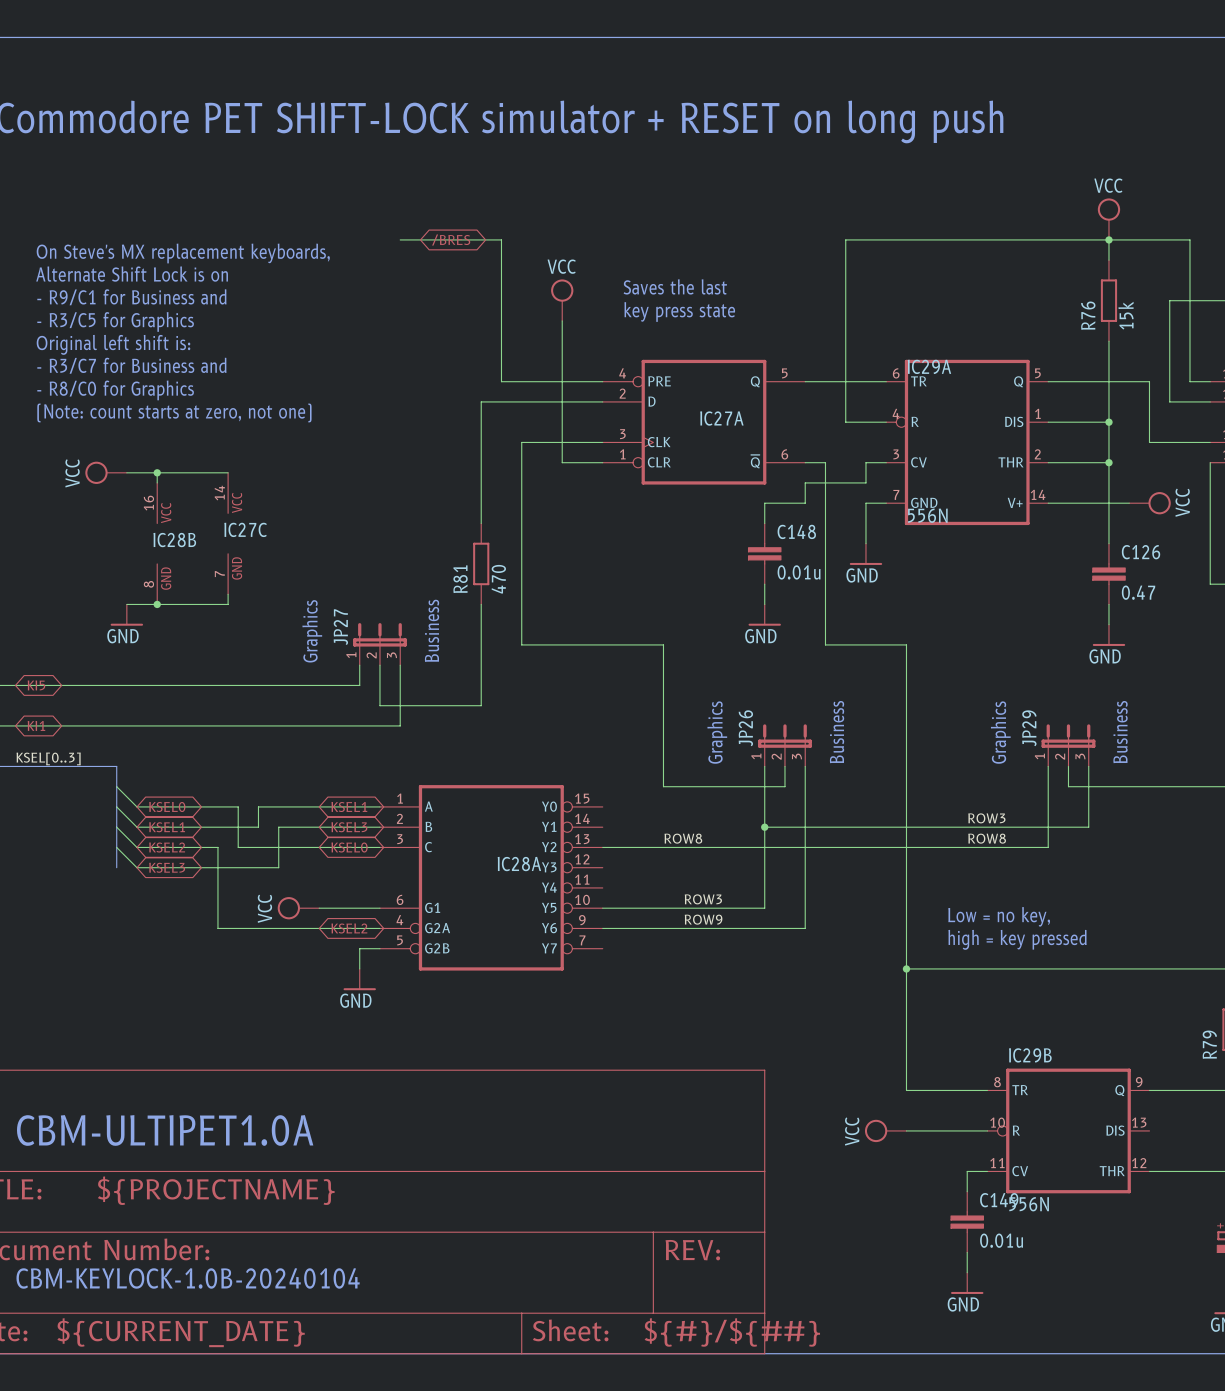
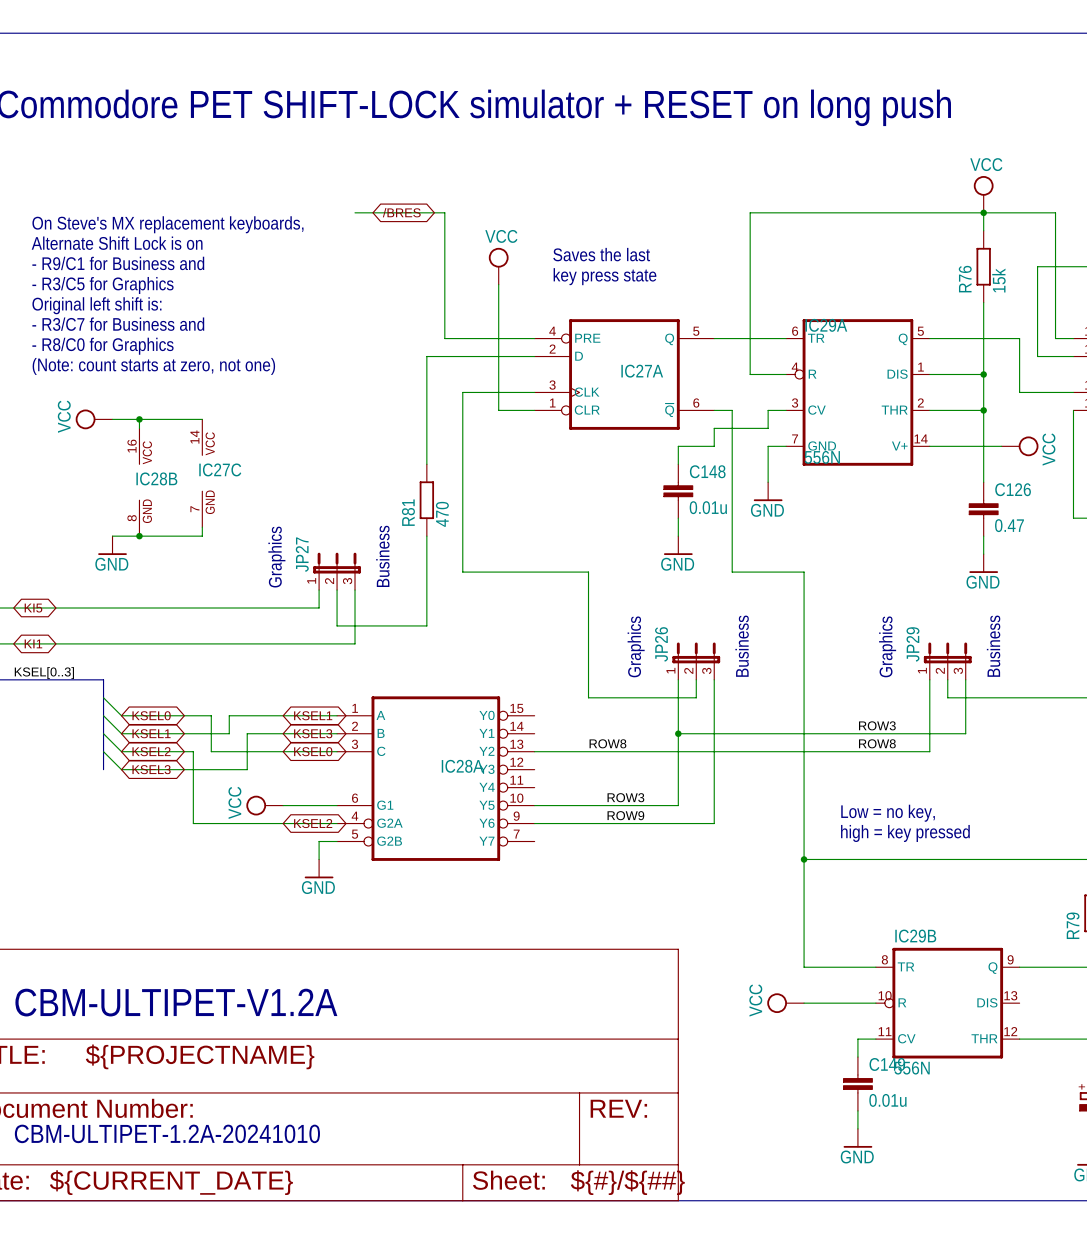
text: CBM-ULTIPET1.0A (165, 1130) -> CBM-ULTIPET-V1.2A (176, 1002)
text: CBM-KEYLOCK-1.0B-20240104 (188, 1278) -> CBM-ULTIPET-1.2A-20241010 (167, 1133)

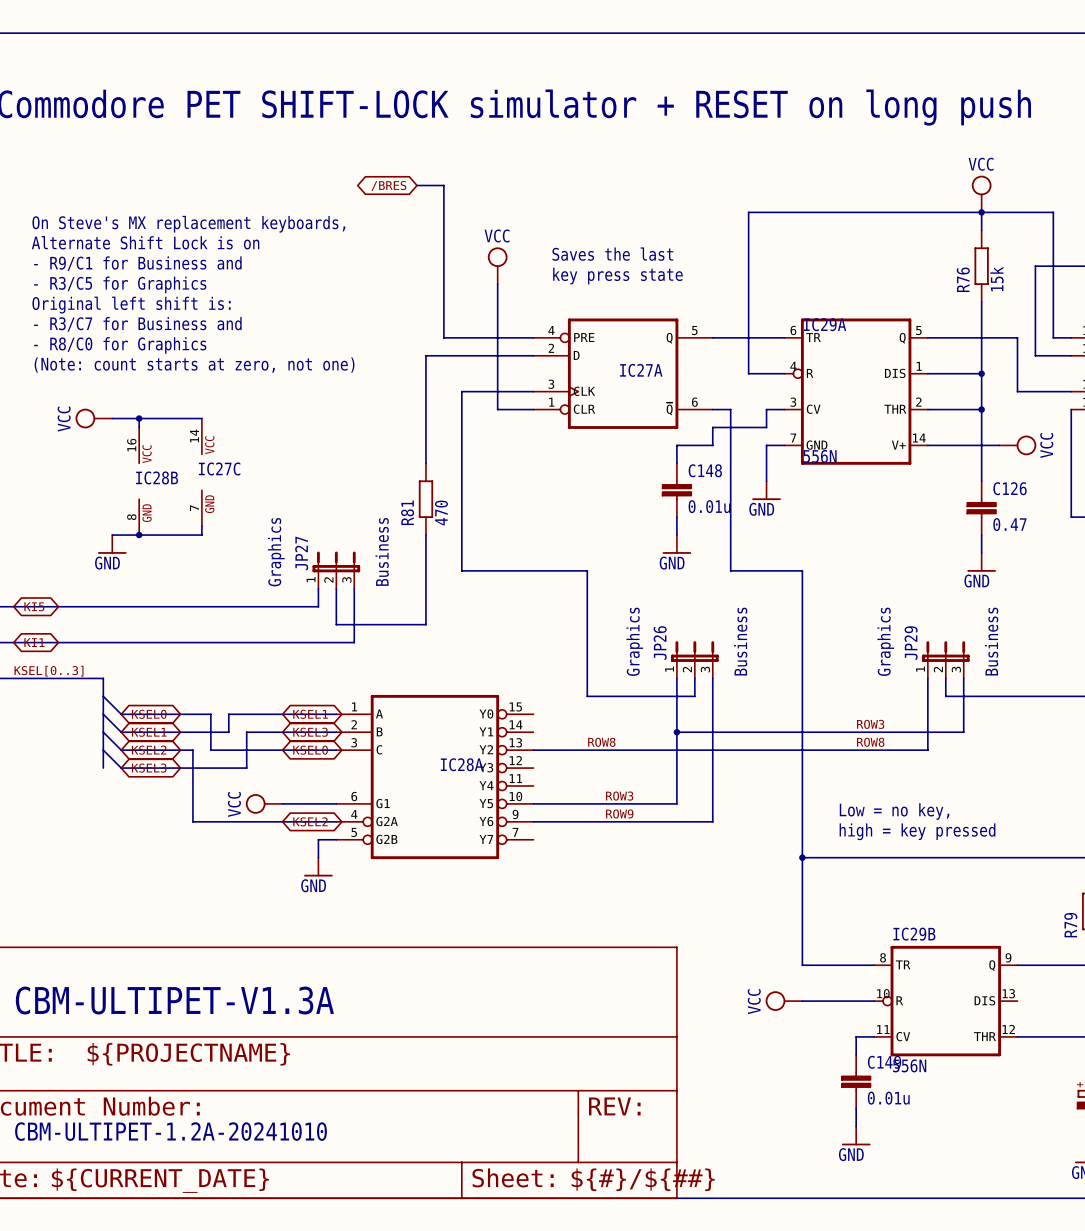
wire: (355, 212) (444, 212) -> (417, 185) (443, 185) (443, 212)
global label rotation: 0° (401, 212) -> 180° (388, 185)
text: CBM-ULTIPET-V1.2A (176, 1002) -> CBM-ULTIPET-V1.3A (174, 1000)

